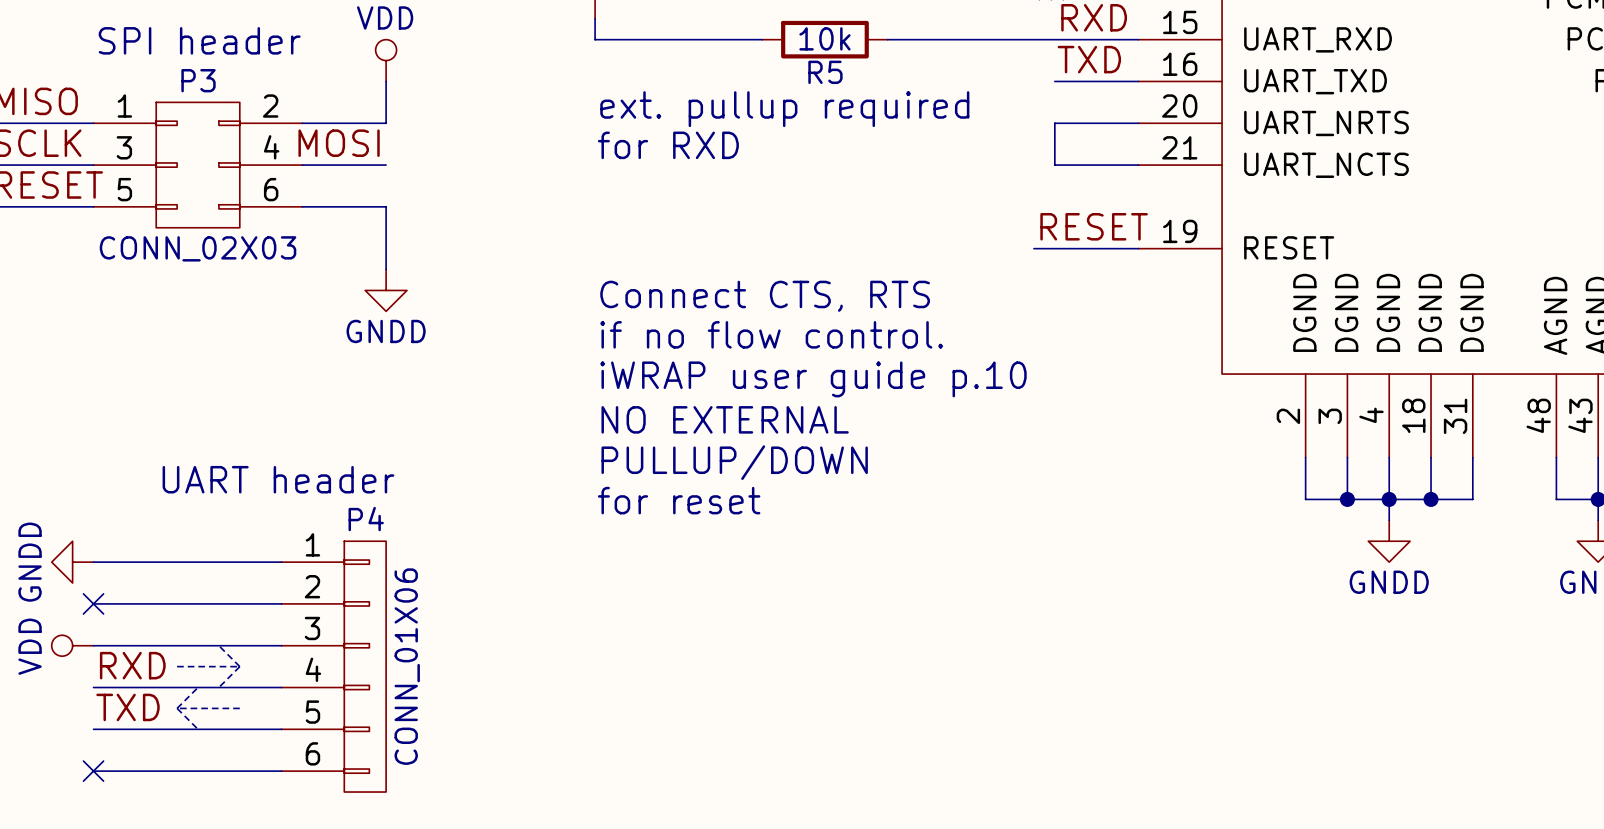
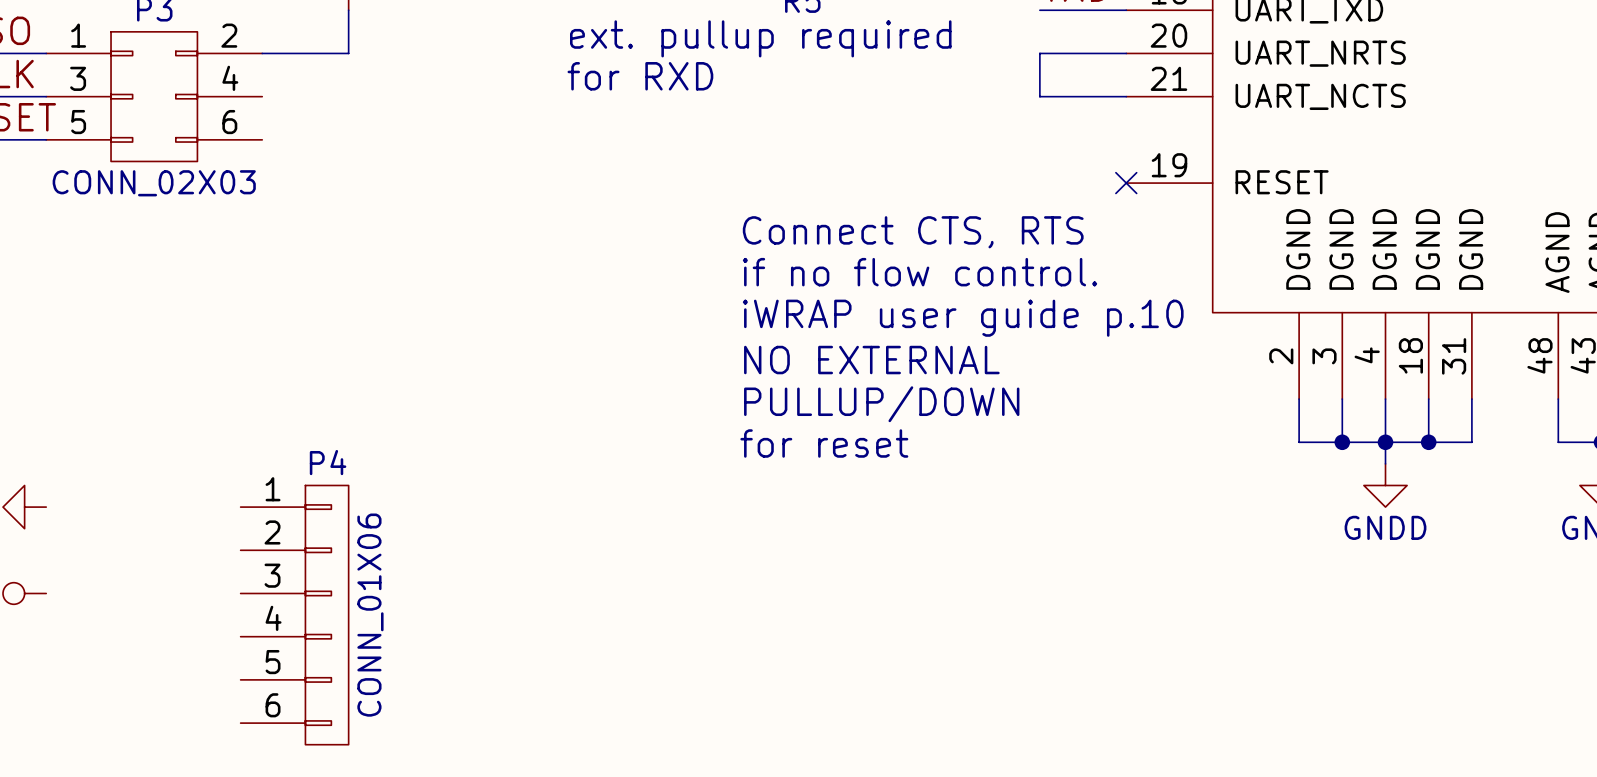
label: MOSI (339, 143) -> none
wire: (302, 165) (386, 165) -> none
wire: (302, 206) (386, 206) (386, 269) -> none
label: RESET (1094, 226) -> none
wire: (1033, 248) (1138, 248) -> none
no-connect mark: none -> (1126, 183)
power symbol: GNDD (386, 290) -> none
text position: Connect CTS, RTS (765, 296) -> Connect CTS, RTS (913, 232)
text position: if no flow control. (771, 334) -> if no flow control. (920, 272)
text position: iWRAP user guide p.10 (813, 379) -> iWRAP user guide p.10 (963, 318)
text position: NO EXTERNAL (725, 419) -> NO EXTERNAL (871, 360)
text position: PULLUP/DOWN (734, 462) -> PULLUP/DOWN (881, 404)
text: UART header (278, 479) -> none
text position: for reset (679, 500) -> for reset (824, 443)
wire: (93, 562) (281, 562) -> none
wire: (93, 603) (281, 603) -> none
no-connect mark: (93, 603) -> none
wire: (93, 645) (281, 645) -> none
line: (218, 645) (239, 666) -> none
label: RXD (132, 665) -> none
line: (177, 666) (239, 666) -> none
line: (239, 666) (218, 687) -> none
wire: (93, 687) (281, 687) -> none
line: (198, 687) (177, 708) -> none
label: TXD (128, 707) -> none
line: (177, 708) (239, 708) -> none
line: (177, 708) (198, 729) -> none
wire: (93, 729) (281, 729) -> none
wire: (93, 771) (281, 771) -> none
no-connect mark: (93, 771) -> none

